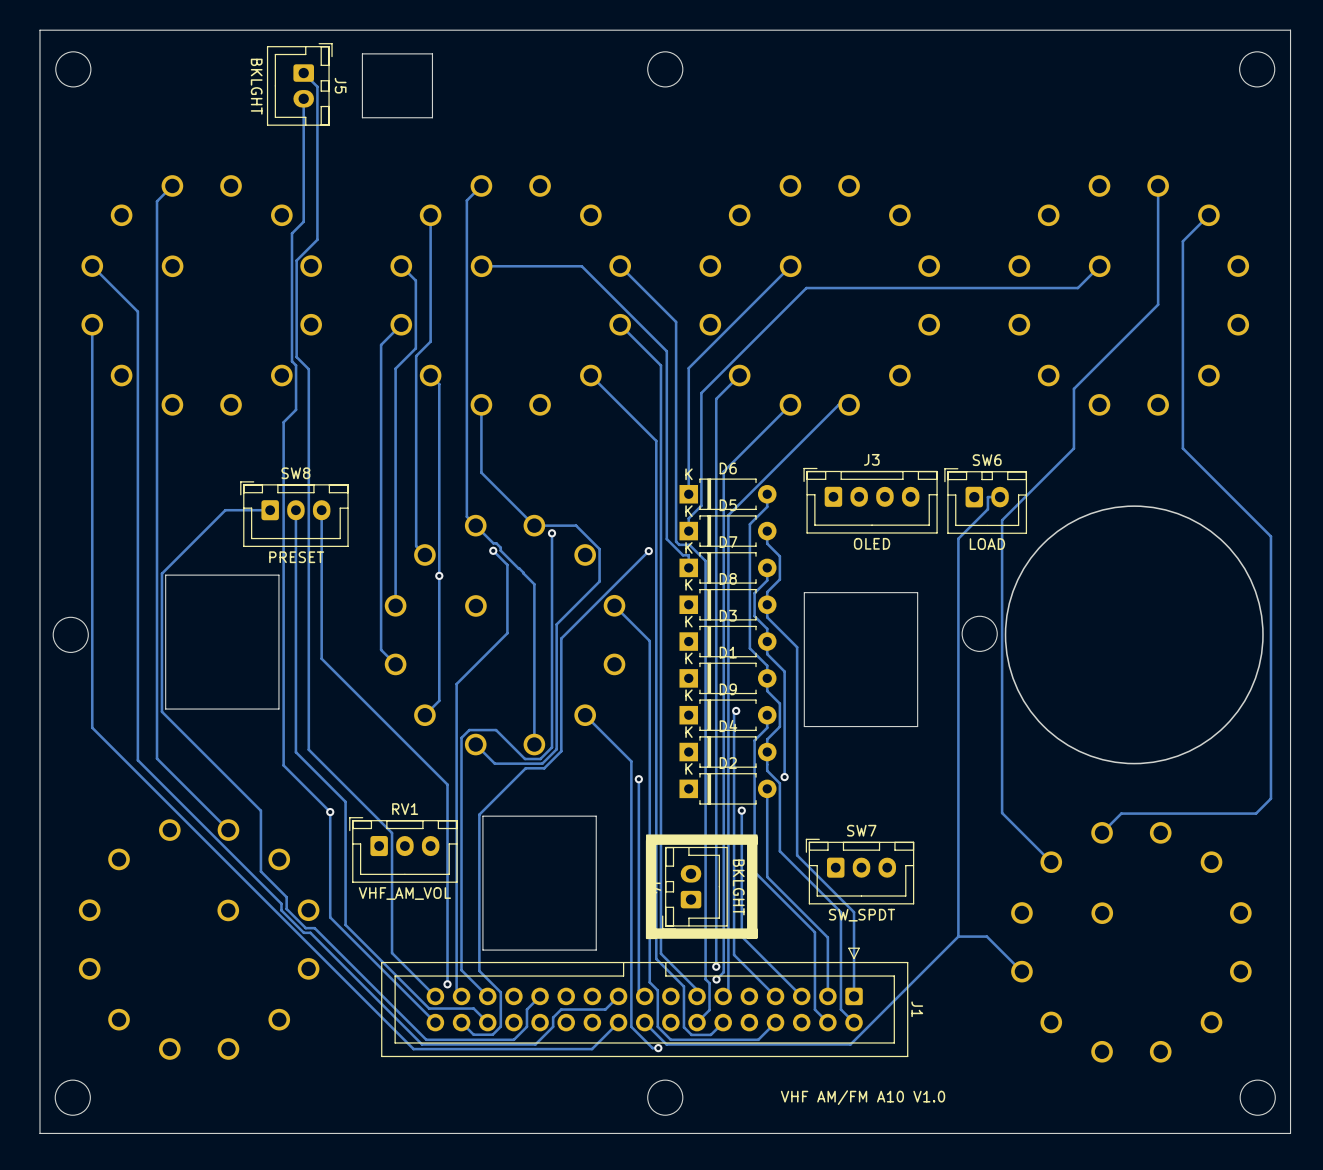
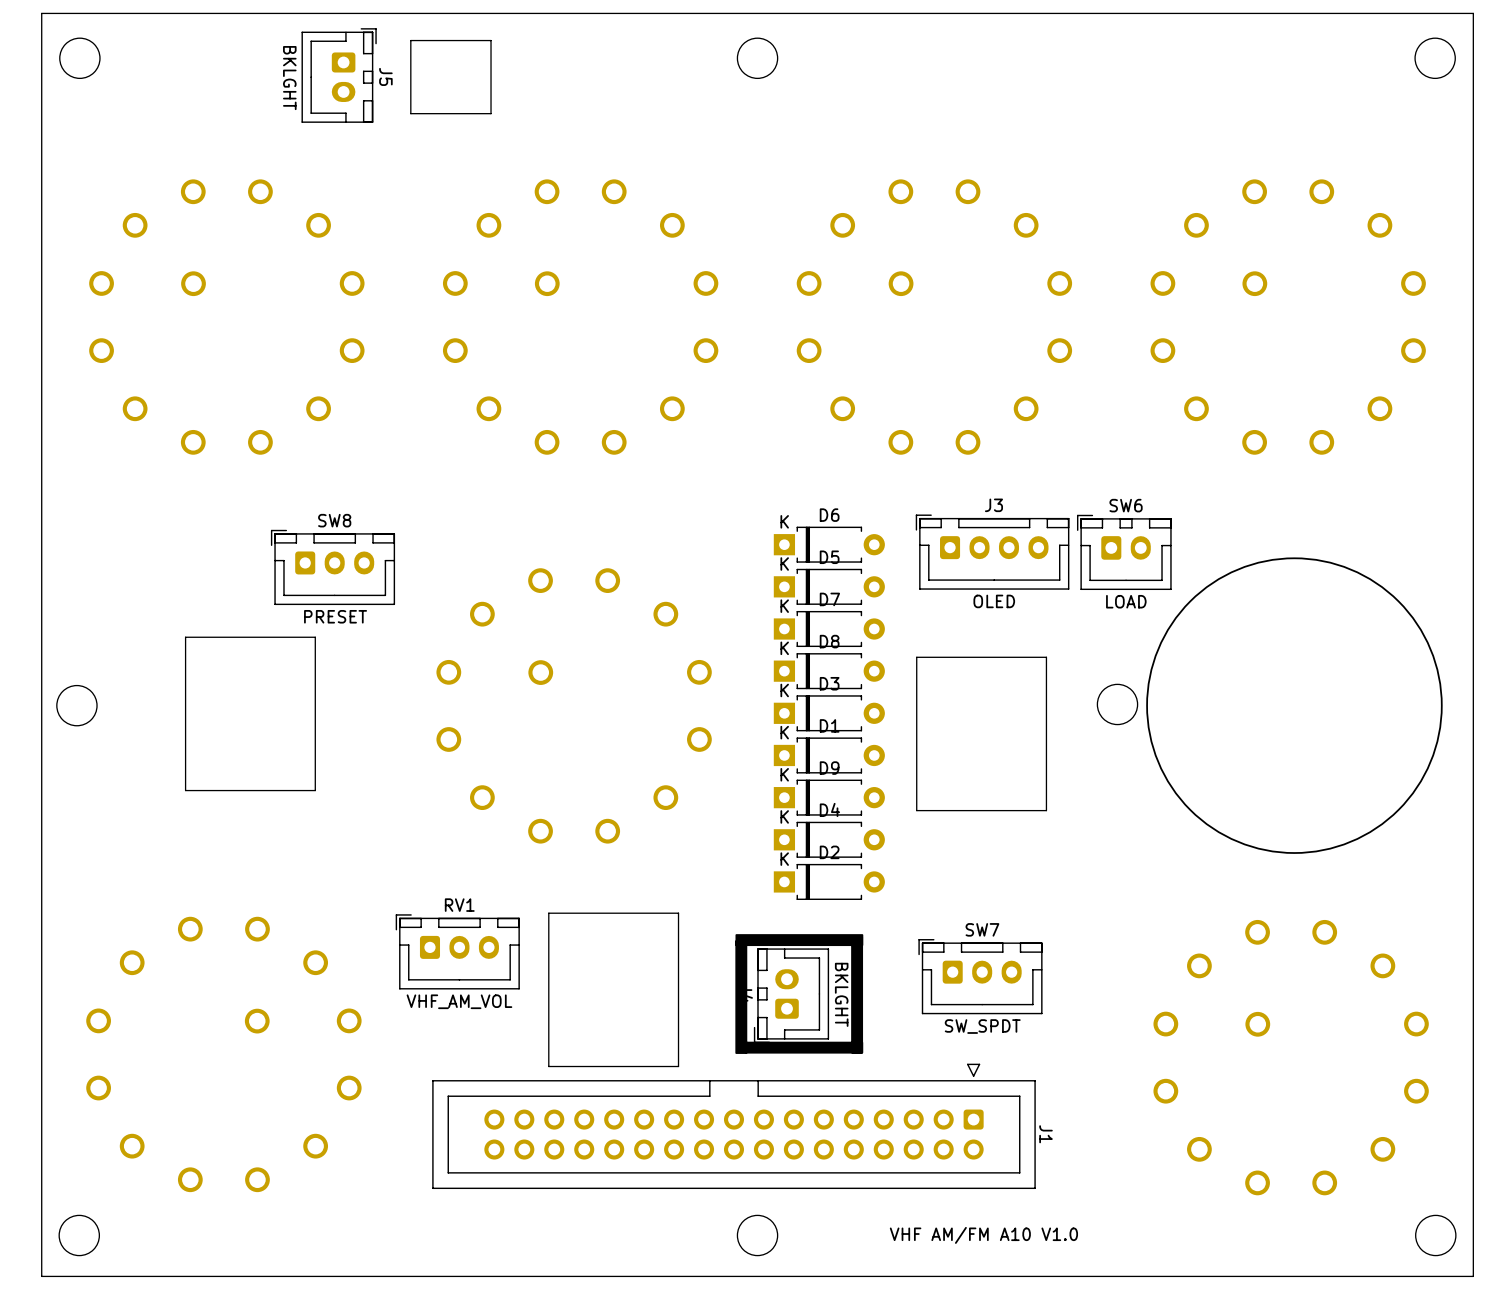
track: (303, 73) (317, 86) (317, 239) (296, 260) (296, 357) (308, 369) (308, 749) (392, 833) (392, 953) (435, 996) -> none
track: (303, 98) (303, 221) (292, 233) (292, 361) (296, 365) (296, 409) (283, 422) (283, 765) (330, 812) (330, 917) (435, 1022) -> none
track: (172, 185) (157, 201) (157, 758) (228, 830) -> none
track: (481, 185) (466, 200) (466, 516) (493, 543) (496, 543) (500, 547) (500, 550) (534, 584) (534, 744) -> none
track: (1158, 185) (1158, 304) (1073, 388) (1073, 448) (1002, 520) (1002, 813) (1051, 862) -> none
track: (430, 215) (430, 341) (416, 356) (416, 546) (424, 554) -> none
track: (1208, 215) (1182, 241) (1182, 448) (1270, 536) (1270, 798) (1256, 813) (1121, 813) (1102, 832) -> none
track: (92, 266) (137, 311) (137, 760) (281, 903) (281, 910) (303, 932) (310, 932) (422, 1044) (535, 1044) (553, 1026) (553, 1017) (561, 1009) (605, 1009) (618, 996) -> none
track: (401, 266) (415, 280) (415, 348) (395, 368) (395, 605) -> none
track: (481, 266) (581, 266) (666, 351) (666, 539) (682, 555) (688, 555) (688, 567) -> none
track: (620, 266) (676, 322) (676, 541) (679, 544) (689, 544) (705, 560) (705, 979) (709, 983) (709, 1010) (697, 1022) -> none
track: (790, 266) (688, 368) (688, 494) -> none
track: (1099, 266) (1077, 288) (806, 288) (701, 393) (701, 505) (688, 518) (688, 531) -> none
track: (92, 324) (92, 727) (413, 1049) (592, 1049) (618, 1022) -> none
track: (401, 324) (381, 344) (381, 649) (395, 664) -> none
track: (620, 324) (660, 365) (660, 953) (697, 989) (697, 996) -> none
track: (430, 375) (439, 384) (439, 700) (424, 715) -> none
track: (590, 375) (656, 440) (656, 958) (683, 986) (683, 1027) (691, 1034) (710, 1034) (723, 1022) -> none
track: (739, 375) (716, 398) (716, 966) -> none
track: (481, 404) (481, 472) (534, 525) (576, 525) (599, 549) (599, 581) (556, 624) (556, 749) (542, 763) (494, 763) (475, 744) -> none
track: (790, 404) (723, 471) (723, 972) (716, 979) -> none
track: (849, 404) (838, 404) (728, 515) (728, 991) (723, 996) -> none
track: (767, 494) (767, 506) (749, 524) (749, 648) (767, 665) (767, 691) (779, 703) (779, 726) (767, 739) (767, 770) (779, 783) (779, 851) (840, 912) (840, 1009) (854, 1022) -> none
track: (1000, 497) (987, 497) (987, 509) (958, 538) (958, 936) -> none
track: (270, 510) (225, 510) (161, 573) (161, 711) (260, 810) (260, 871) (286, 897) (286, 909) (305, 928) (314, 928) (426, 1039) (513, 1039) (526, 1026) (526, 1009) (540, 996) -> none
track: (295, 510) (295, 752) (345, 801) (345, 924) (429, 1008) (473, 1008) (487, 1022) -> none
track: (321, 510) (321, 658) (447, 784) (447, 984) -> none
track: (767, 531) (767, 543) (779, 556) (779, 579) (767, 592) (767, 617) (797, 647) (797, 855) (854, 912) (854, 996) -> none
track: (552, 533) (552, 747) (540, 759) (525, 759) (496, 730) (469, 730) (461, 737) (461, 970) (487, 996) -> none
via: (552, 533) -> none
track: (493, 550) (507, 564) (507, 633) (456, 684) (456, 991) (461, 996) -> none
via: (493, 550) -> none
track: (648, 551) (561, 638) (561, 751) (544, 768) (525, 768) (479, 814) (479, 970) (500, 992) (500, 1026) (492, 1034) (473, 1034) (461, 1022) -> none
via: (648, 551) -> none
track: (767, 567) (767, 580) (754, 593) (754, 616) (767, 628) (767, 654) (784, 671) (784, 777) -> none
via: (439, 575) -> none
track: (614, 605) (649, 641) (649, 982) (657, 990) (657, 1026) (670, 1039) (758, 1039) (775, 1022) -> none
track: (736, 710) (734, 713) (734, 954) (775, 996) -> none
via: (736, 710) -> none
track: (585, 715) (631, 761) (631, 1026) (652, 1048) (658, 1048) -> none
track: (767, 715) (767, 727) (754, 740) (754, 871) (814, 932) (814, 1009) (827, 1022) -> none
via: (784, 777) -> none
track: (638, 779) (638, 990) (644, 996) -> none
via: (638, 779) -> none
track: (767, 788) (767, 876) (827, 937) (827, 996) -> none
track: (741, 810) (741, 936) (801, 996) -> none
via: (741, 810) -> none
via: (330, 812) -> none
track: (958, 936) (850, 1044) (666, 1044) (644, 1022) -> none
track: (958, 936) (986, 936) (1021, 971) -> none
via: (716, 966) -> none
via: (716, 979) -> none
via: (447, 984) -> none
via: (658, 1048) -> none

